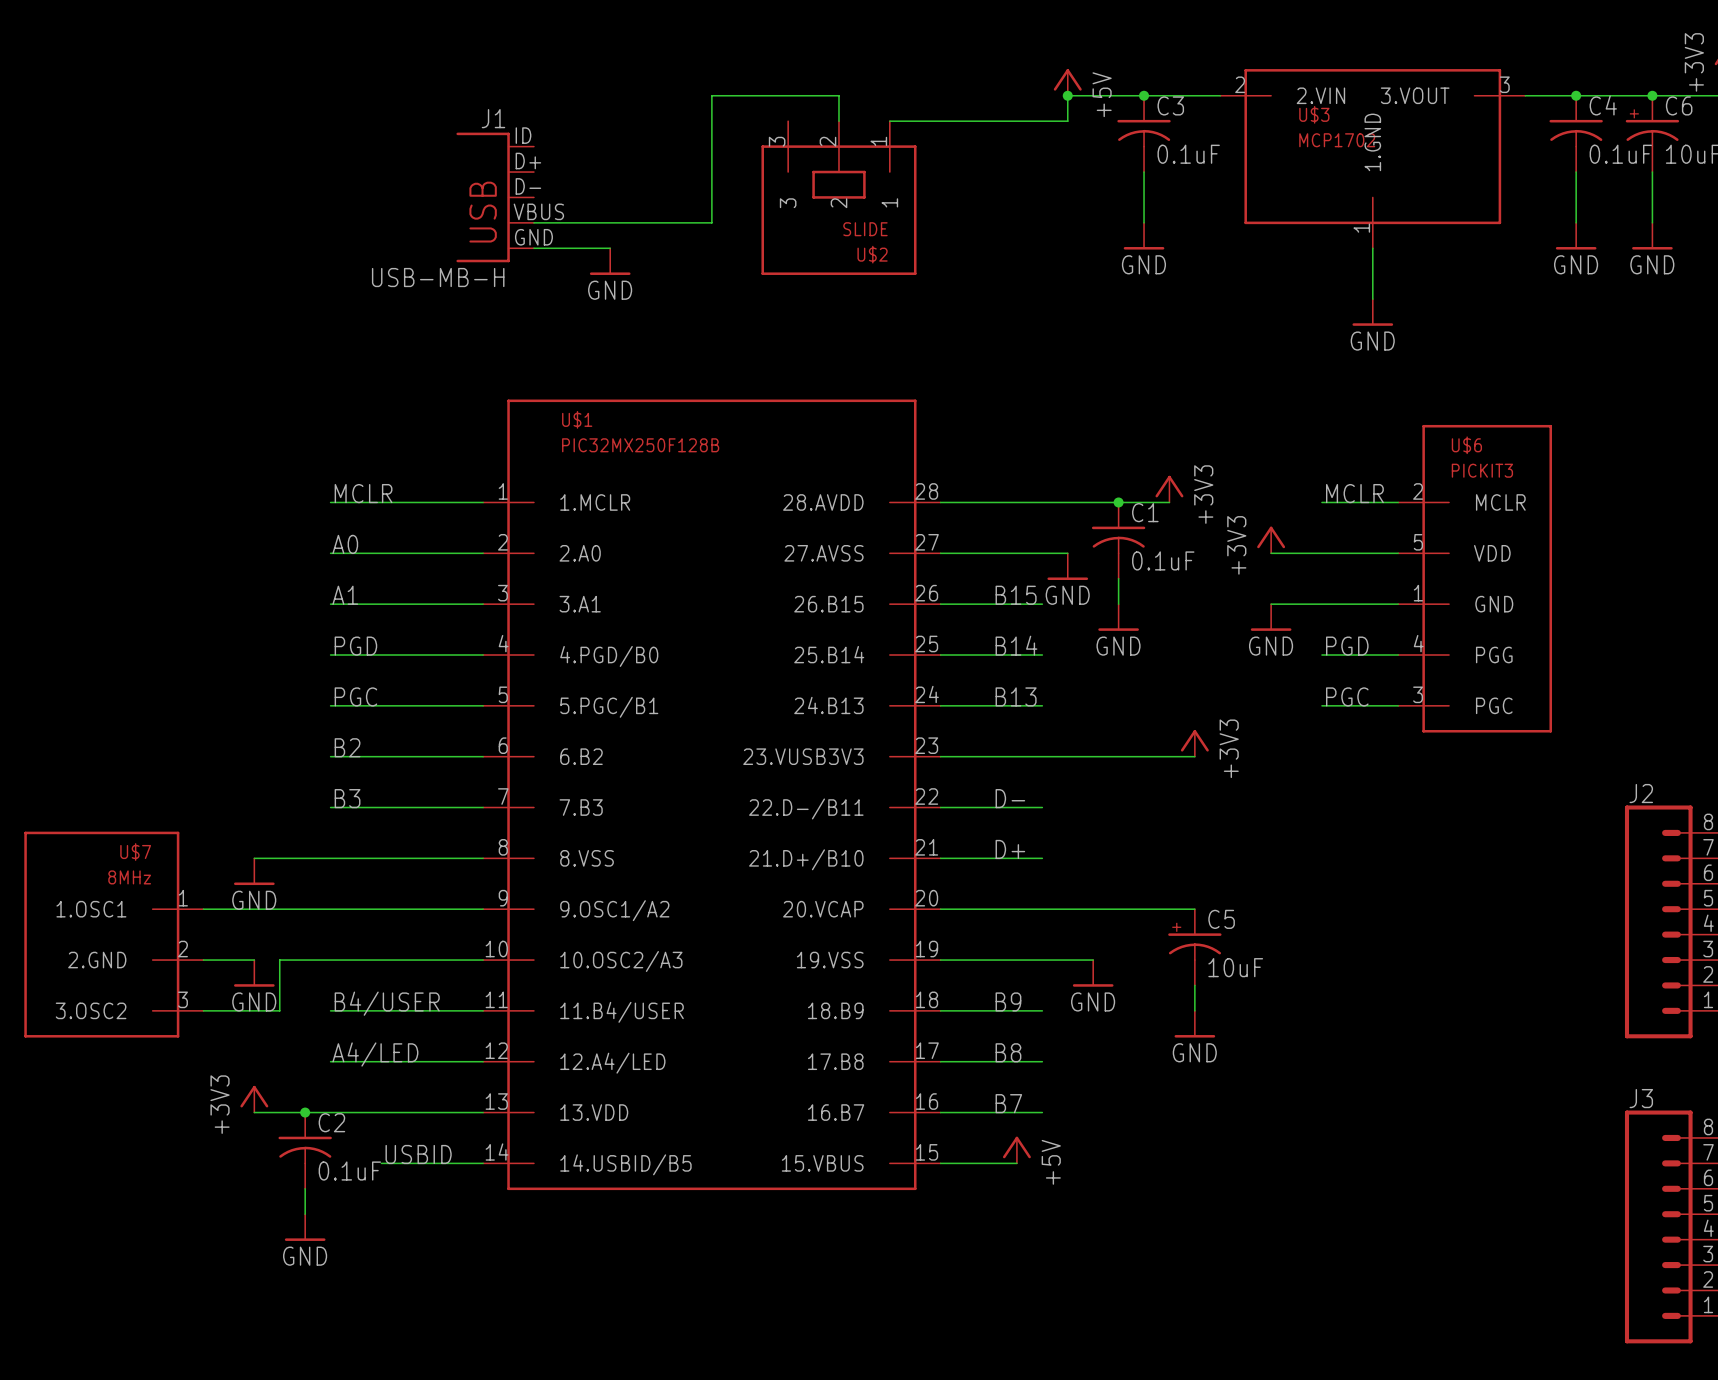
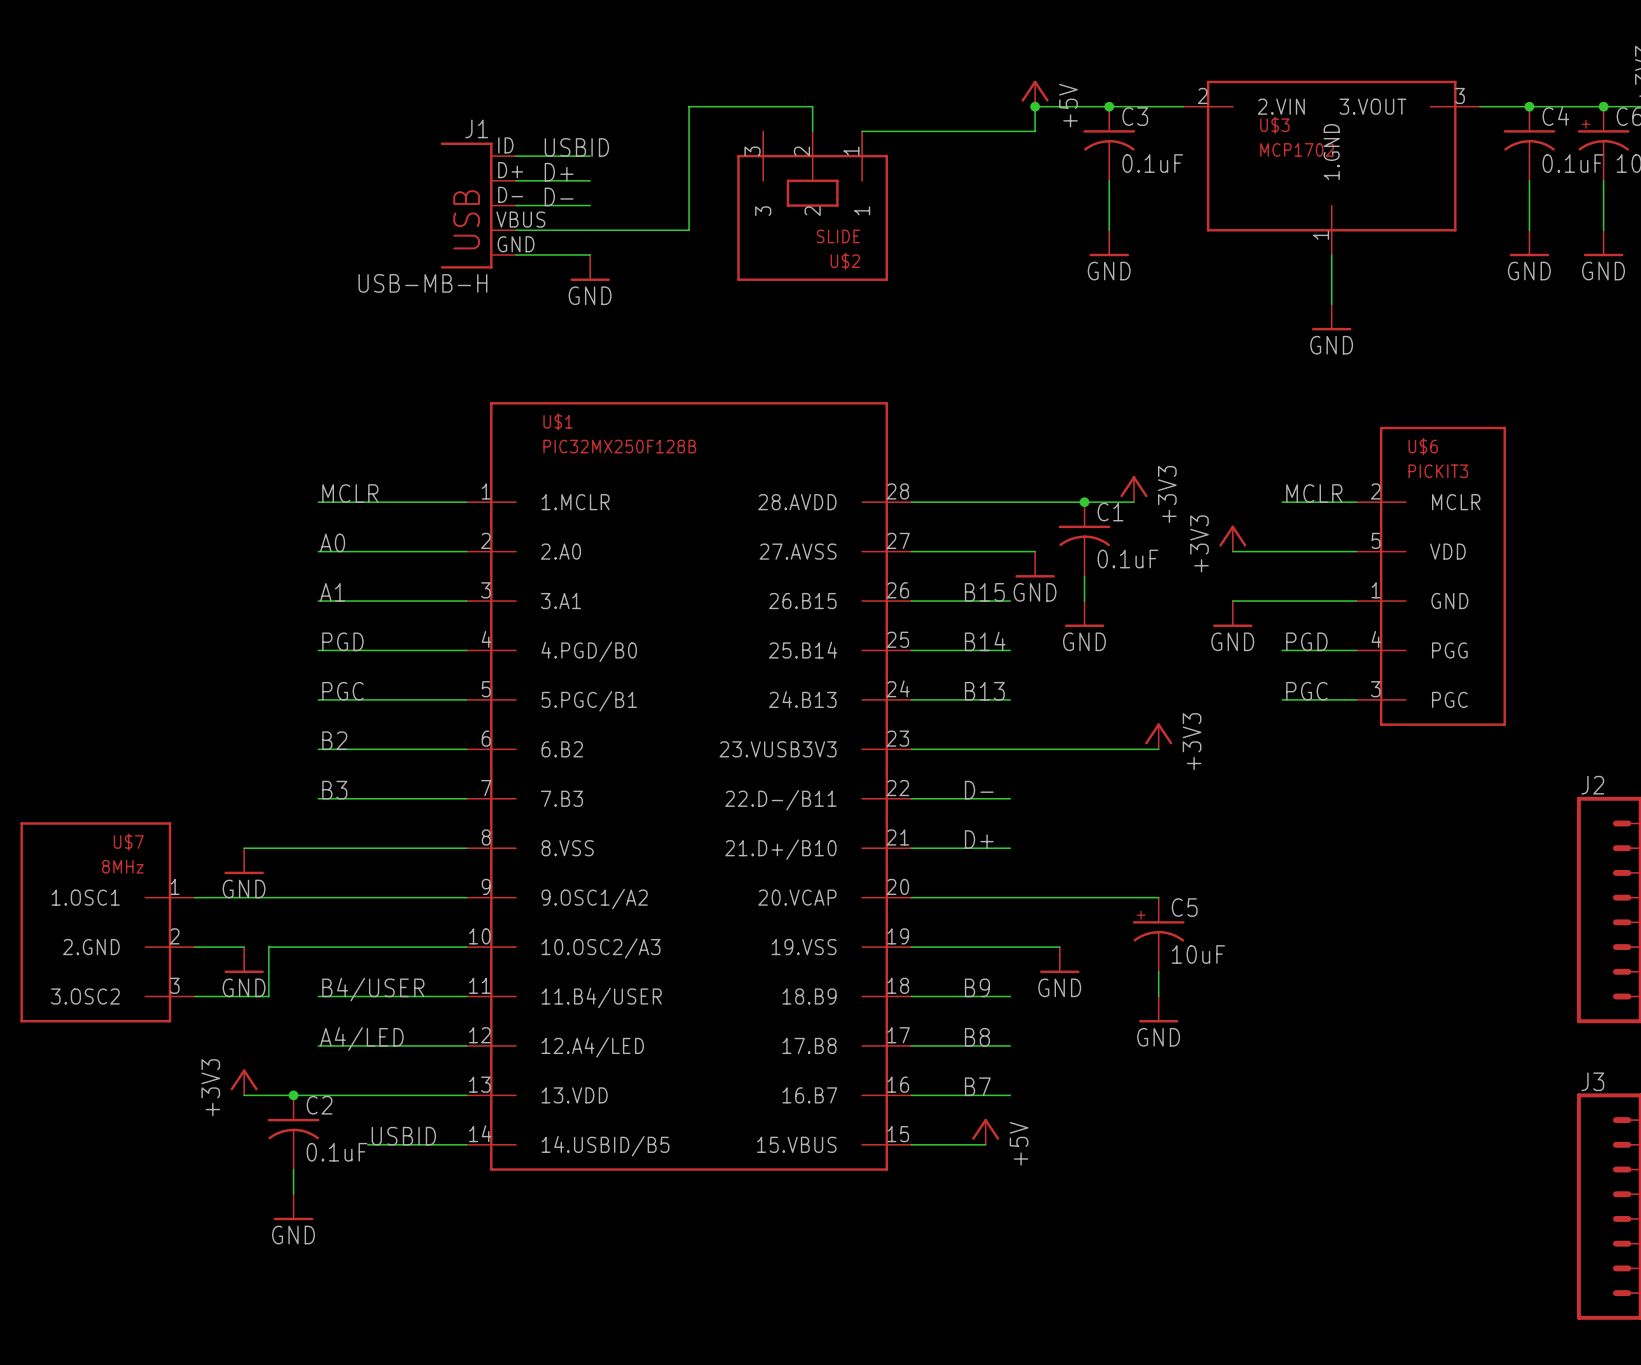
label: none -> USBID (576, 147)
wire: none -> (516, 156) (590, 156)
label: none -> D+ (559, 172)
wire: none -> (516, 180) (590, 180)
label: none -> D- (559, 196)
wire: none -> (516, 205) (590, 205)

